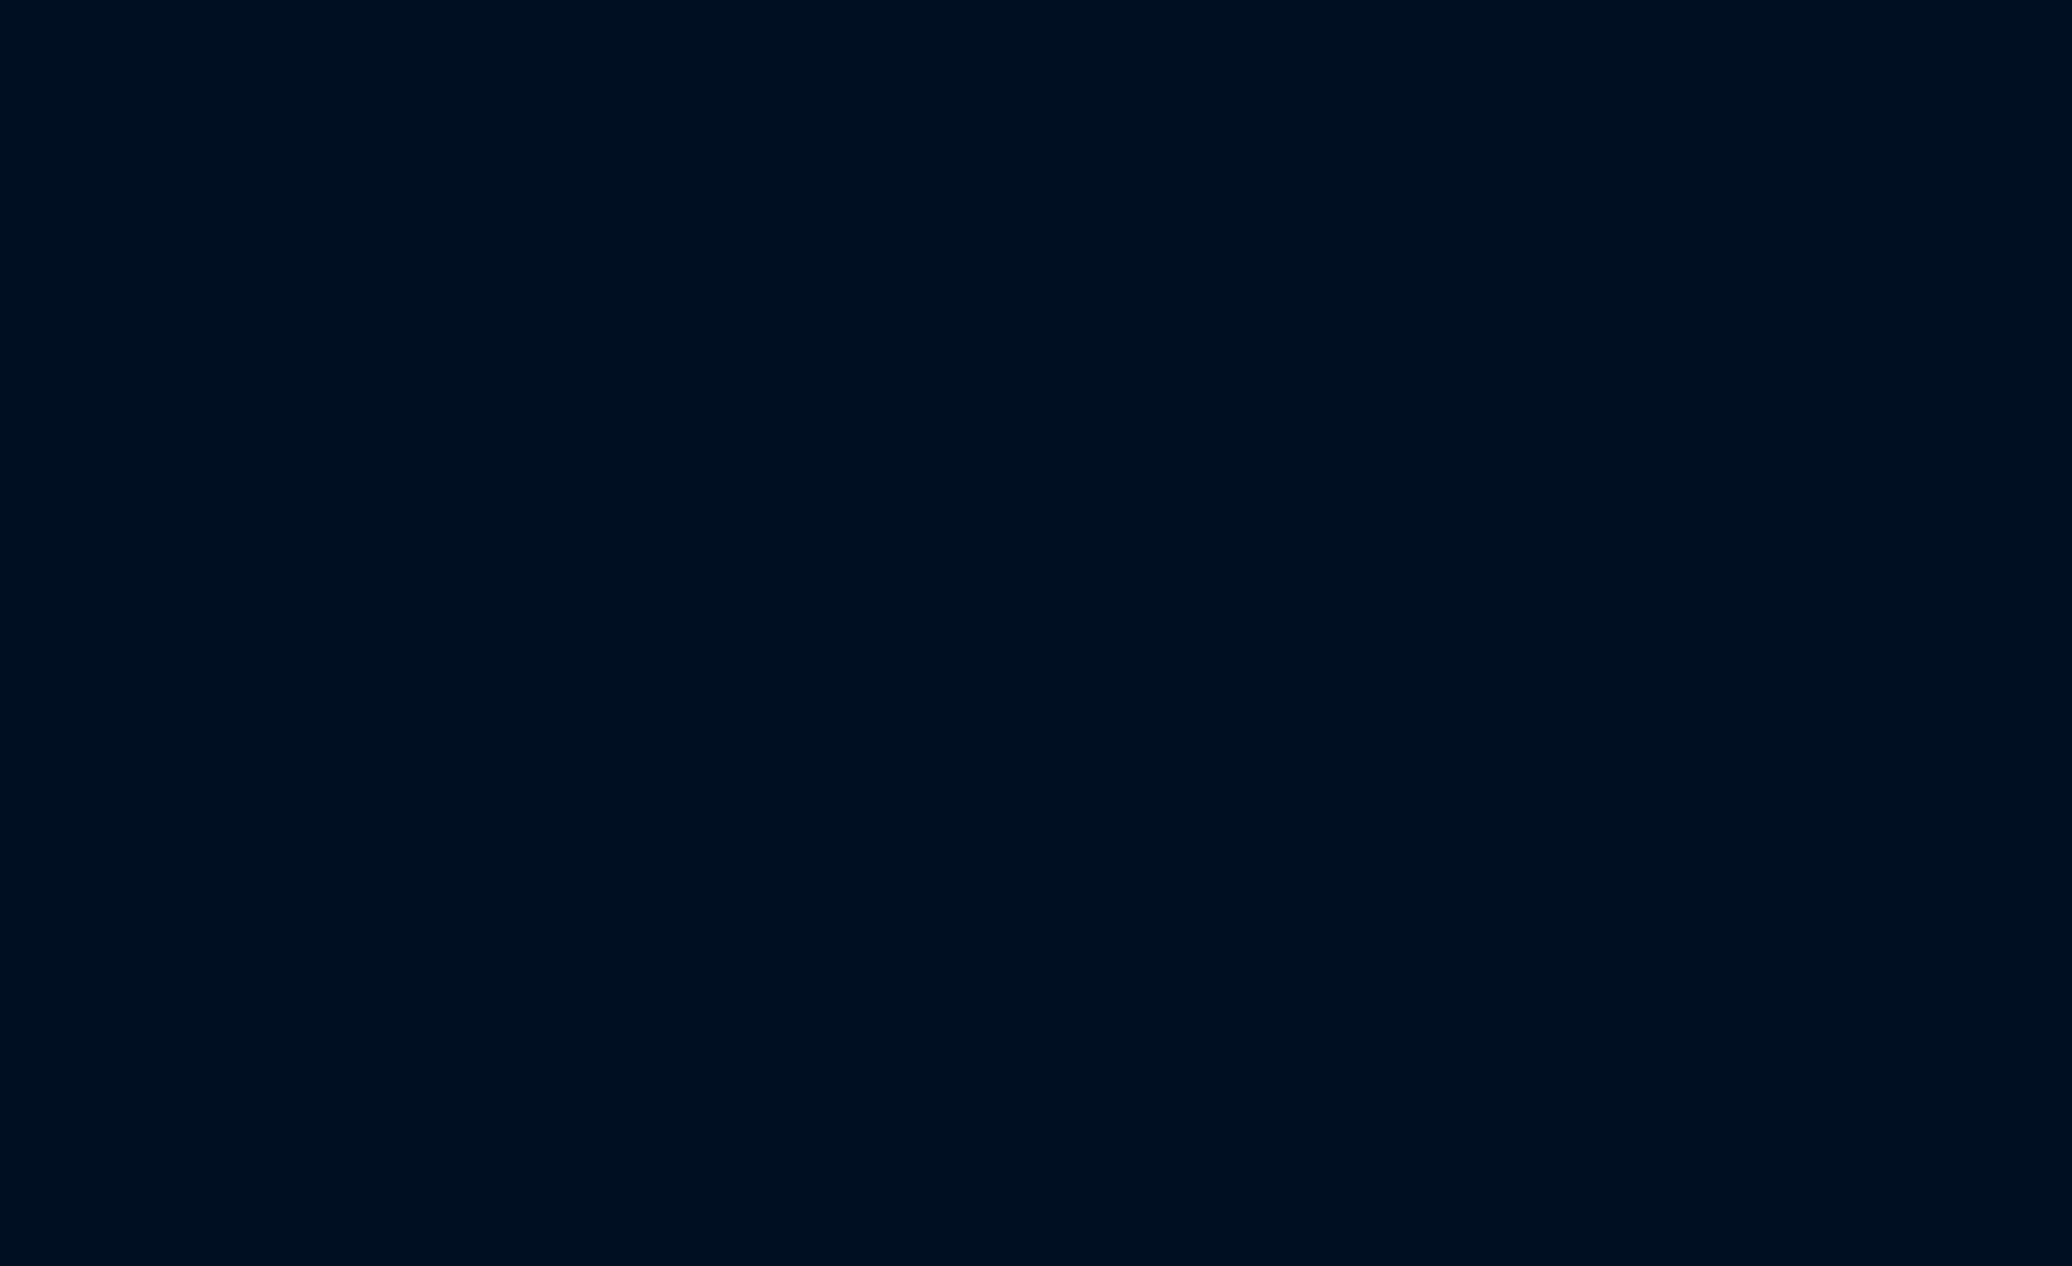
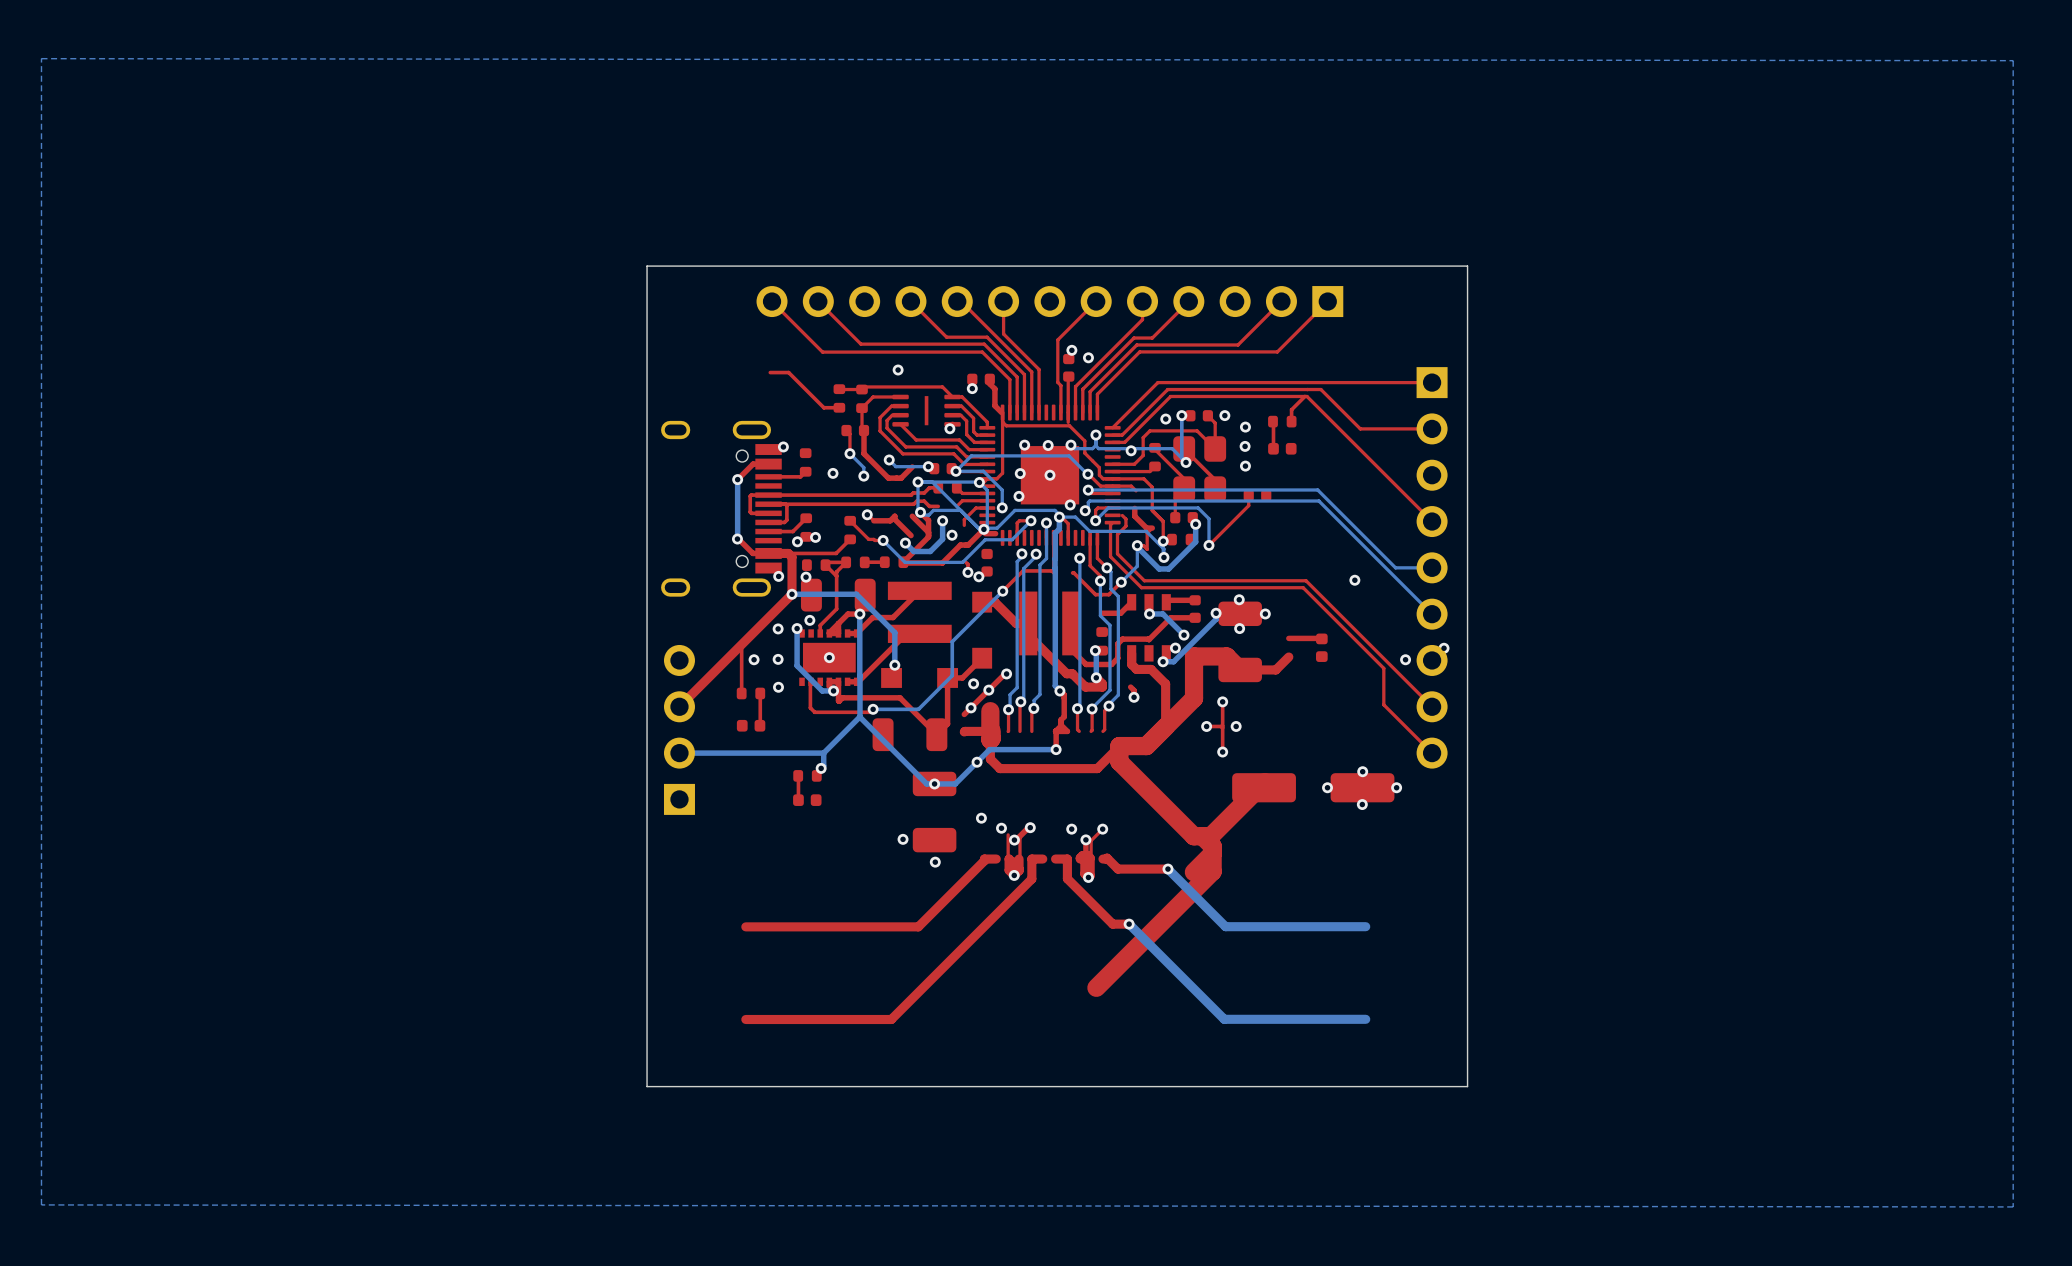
bottom zone outline: none -> (41, 58) (41, 1204) (2013, 1206) (2013, 60) (41, 58)
board edge: none -> (1467, 266) (647, 266) (647, 1086) (1467, 1086) (1467, 266)
top track: none -> (772, 301) (822, 352) (982, 352) (1009, 379) (1009, 412)
top track: none -> (818, 301) (860, 344) (984, 344) (1017, 377) (1017, 412)
top track: none -> (910, 301) (946, 337) (987, 337) (1024, 374) (1024, 412)
top track: none -> (957, 301) (961, 301) (1031, 372) (1031, 412)
top track: none -> (1003, 301) (1003, 334) (1039, 369) (1039, 412)
part: none -> (1049, 301)
top track: none -> (1096, 301) (1057, 339) (1057, 382) (1060, 385) (1060, 412)
top track: none -> (1142, 301) (1142, 319) (1075, 386) (1075, 412)
top track: none -> (1188, 301) (1152, 338) (1133, 338) (1082, 389) (1082, 412)
top track: none -> (1281, 301) (1238, 344) (1136, 344) (1090, 391) (1090, 412)
top track: none -> (1327, 301) (1277, 351) (1139, 351) (1097, 394) (1097, 412)
via: none -> (1071, 350)
via: none -> (1088, 357)
part: none -> (1068, 367)
via: none -> (898, 370)
top track: none -> (770, 372) (788, 372) (823, 407) (839, 407)
top track: none -> (1068, 376) (1068, 422)
part: none -> (981, 379)
top track: none -> (989, 379) (989, 383) (994, 388) (994, 405) (1001, 412)
top track: none -> (1432, 382) (1157, 382) (1112, 427)
via: none -> (972, 388)
top track: none -> (839, 389) (862, 389) (864, 386) (942, 386) (952, 396) (962, 396) (987, 422) (987, 427)
top track: none -> (900, 396) (873, 396) (862, 408) (864, 453) (888, 478) (901, 478) (912, 466)
top track: none -> (1304, 396) (1291, 409) (1291, 421)
part: none -> (839, 398)
part: none -> (862, 398)
top track: none -> (900, 406) (891, 406) (880, 417) (880, 431) (902, 453) (953, 453) (964, 464) (987, 464)
top track: none -> (952, 406) (961, 406) (973, 418) (973, 431) (977, 435) (987, 435)
part: none -> (926, 410)
top track: none -> (1002, 412) (1002, 473) (996, 478) (987, 478) (983, 482) (979, 482)
top track: none -> (900, 415) (892, 415) (887, 420) (887, 428) (905, 446) (956, 446) (966, 456) (987, 456)
top track: none -> (952, 415) (960, 415) (966, 421) (966, 434) (974, 442) (987, 442)
bottom track: none -> (1181, 415) (1181, 458) (1186, 462) (1172, 448) (1098, 448) (1095, 445) (1095, 435)
via: none -> (1181, 415)
part: none -> (1199, 415)
top track: none -> (1207, 415) (1215, 423) (1215, 448) (1197, 430) (1149, 430) (1143, 437) (1143, 455) (1134, 464) (1112, 464)
via: none -> (1224, 415)
via: none -> (1165, 419)
top track: none -> (1272, 421) (1273, 448)
part: none -> (1282, 421)
top track: none -> (1002, 422) (1006, 425) (1069, 425) (1084, 441) (1084, 453) (1092, 460)
top track: none -> (900, 424) (916, 439) (959, 439) (969, 449) (987, 449)
via: none -> (1245, 427)
via: none -> (949, 428)
top track: none -> (1432, 428) (1360, 428) (1320, 389) (1167, 389) (1122, 435) (1112, 435)
top track: none -> (846, 430) (849, 434) (849, 453)
part: none -> (855, 430)
via: none -> (1095, 435)
top track: none -> (1112, 442) (1124, 442) (1170, 396) (1307, 396) (1432, 521)
via: none -> (1024, 445)
via: none -> (1048, 445)
bottom track: none -> (1070, 445) (1074, 448) (1092, 448) (1095, 445)
via: none -> (1070, 445)
via: none -> (783, 446)
via: none -> (1245, 446)
top track: none -> (1155, 447) (1184, 478) (1184, 489) (1175, 498) (1175, 517)
top track: none -> (1184, 448) (1215, 479) (1215, 489)
part: none -> (1282, 448)
via: none -> (1131, 450)
bottom track: none -> (849, 453) (863, 467) (863, 476)
via: none -> (849, 453)
part: none -> (1155, 457)
bottom track: none -> (889, 459) (895, 466) (928, 466)
via: none -> (889, 459)
top track: none -> (1092, 461) (1099, 467) (1099, 475) (1103, 478) (1143, 478) (1152, 487) (1152, 510) (1163, 521) (1163, 541)
part: none -> (805, 462)
via: none -> (1186, 462)
top track: none -> (768, 464) (753, 464) (737, 479)
via: none -> (928, 466)
top track: none -> (1155, 466) (1149, 471) (1112, 471)
via: none -> (1245, 466)
part: none -> (942, 468)
part: none -> (1199, 469)
top track: none -> (805, 471) (800, 476) (768, 476)
via: none -> (955, 471)
via: none -> (833, 473)
via: none -> (1020, 473)
top track: none -> (1087, 474) (1100, 486) (1131, 486) (1136, 490)
bottom track: none -> (1087, 474) (1068, 455) (971, 455) (955, 471) (983, 471) (1002, 490) (1002, 507)
via: none -> (1087, 474)
part: none -> (1049, 475)
via: none -> (1049, 475)
via: none -> (863, 476)
bottom track: none -> (737, 479) (737, 538)
via: none -> (737, 479)
via: none -> (917, 482)
bottom track: none -> (932, 482) (979, 529) (997, 528) (1014, 510) (1054, 510) (1059, 517)
via: none -> (979, 482)
top track: none -> (938, 487) (929, 487) (924, 493) (913, 493) (911, 495) (750, 496) (751, 513) (768, 513)
part: none -> (947, 487)
top track: none -> (956, 487) (962, 493) (987, 493)
top track: none -> (1090, 487) (1088, 490) (1091, 493) (1112, 493)
bottom track: none -> (1090, 489) (1317, 489) (1395, 567) (1432, 567)
via: none -> (1088, 490)
top track: none -> (1248, 495) (1248, 505) (1208, 545)
part: none -> (1257, 495)
via: none -> (1018, 496)
top track: none -> (987, 500) (962, 500) (956, 506)
top track: none -> (768, 504) (913, 504) (916, 501) (924, 501) (929, 506) (938, 506)
top track: none -> (785, 504) (786, 520) (784, 522) (768, 522)
via: none -> (1070, 504)
via: none -> (1002, 507)
part: none -> (721, 508)
top track: none -> (987, 508) (975, 508) (964, 519) (964, 525)
top track: none -> (1112, 508) (1097, 508) (1095, 510) (1095, 520)
top track: none -> (1134, 508) (1134, 516) (1146, 528) (1152, 528) (1147, 533) (1147, 549) (1143, 545) (1137, 545)
bottom track: none -> (960, 510) (933, 510) (928, 515) (923, 515) (917, 509) (917, 482) (978, 482) (987, 490) (987, 525) (983, 529)
bottom track: none -> (1085, 510) (1088, 507) (1089, 501) (1318, 501) (1432, 614)
via: none -> (1085, 510)
top track: none -> (920, 512) (928, 520) (928, 537) (904, 562) (942, 562) (960, 545) (968, 545) (983, 529)
via: none -> (920, 512)
top track: none -> (867, 514) (873, 520) (890, 520) (894, 516) (894, 519) (911, 535)
via: none -> (867, 514)
top track: none -> (1122, 515) (1125, 519) (1125, 526) (1117, 534) (1117, 553) (1144, 580) (1306, 580) (1432, 706)
top track: none -> (912, 516) (928, 532)
top track: none -> (1059, 517) (1068, 523) (1068, 537)
bottom track: none -> (1059, 517) (1059, 528) (1055, 533) (1055, 558)
bottom track: none -> (1059, 517) (1075, 517) (1089, 531) (1146, 531) (1163, 549) (1163, 557) (1163, 556) (1163, 541)
via: none -> (1059, 517)
part: none -> (1184, 517)
top track: none -> (806, 518) (792, 531) (768, 531)
top track: none -> (850, 520) (868, 539) (883, 540)
bottom track: none -> (942, 520) (942, 539) (930, 551) (913, 551) (905, 543)
via: none -> (942, 520)
top track: none -> (1030, 520) (1019, 520) (1017, 523) (1017, 537)
bottom track: none -> (1030, 520) (1012, 539) (985, 539) (962, 562) (905, 562) (883, 540)
via: none -> (1030, 520)
bottom track: none -> (1095, 520) (1108, 507) (1198, 507) (1208, 518) (1208, 545)
via: none -> (1095, 520)
top track: none -> (1112, 522) (1110, 524) (1110, 556) (1141, 587) (1303, 587) (1383, 668) (1383, 704) (1432, 753)
bottom track: none -> (1046, 523) (1046, 558) (1039, 565) (1039, 694) (1034, 700) (1033, 708)
via: none -> (1046, 523)
bottom track: none -> (1195, 524) (1195, 542) (1168, 568) (1159, 568) (1137, 545) (1137, 566) (1121, 582)
via: none -> (1195, 524)
part: none -> (806, 527)
via: none -> (983, 529)
part: none -> (850, 530)
top track: none -> (995, 533) (985, 533)
via: none -> (952, 535)
via: none -> (815, 537)
top track: none -> (1053, 537) (1054, 572) (1052, 570) (1023, 570) (1002, 591)
top track: none -> (1090, 537) (1090, 565) (1100, 575) (1100, 580)
top track: none -> (1097, 537) (1097, 558) (1106, 567)
top track: none -> (737, 539) (752, 553) (768, 553)
via: none -> (737, 539)
top track: none -> (850, 539) (836, 553) (768, 553)
part: none -> (1181, 539)
via: none -> (883, 540)
via: none -> (797, 541)
via: none -> (1163, 541)
via: none -> (905, 543)
via: none -> (1137, 545)
via: none -> (1208, 545)
top track: none -> (768, 553) (788, 553) (792, 557) (792, 594) (679, 706)
bottom track: none -> (1021, 553) (1021, 556) (1017, 561) (1017, 687) (1010, 694) (1010, 707) (1008, 709)
via: none -> (1021, 553)
bottom track: none -> (1036, 554) (1023, 568) (1023, 698) (1020, 701)
via: none -> (1036, 554)
via: none -> (1163, 557)
bottom track: none -> (1055, 558) (1055, 568)
bottom track: none -> (1079, 558) (1077, 558) (1079, 560) (1079, 706) (1077, 708)
via: none -> (1079, 558)
top track: none -> (866, 561) (884, 562)
part: none -> (855, 562)
part: none -> (894, 562)
top track: none -> (966, 562) (967, 572)
part: none -> (987, 562)
part: none -> (816, 565)
bottom track: none -> (1106, 567) (1110, 571) (1110, 589) (1118, 596) (1118, 695) (1108, 706)
via: none -> (1106, 567)
part: none -> (1432, 567)
bottom track: none -> (1055, 568) (1055, 685) (1059, 691)
via: none -> (967, 572)
top track: none -> (1072, 572) (1095, 594) (1108, 594) (1121, 582)
via: none -> (778, 576)
top track: none -> (836, 576) (825, 565) (828, 562) (846, 562) (836, 571) (836, 609) (820, 625) (820, 633)
via: none -> (978, 576)
via: none -> (806, 577)
bottom track: none -> (1100, 580) (1100, 615) (1109, 625) (1109, 690) (1092, 708)
via: none -> (1100, 580)
via: none -> (1354, 580)
via: none -> (1121, 582)
top track: none -> (919, 590) (893, 617) (872, 617) (856, 633) (847, 633)
bottom track: none -> (1002, 591) (952, 641) (952, 675) (918, 709) (873, 709)
via: none -> (1002, 591)
bottom track: none -> (792, 594) (856, 594) (894, 632) (894, 665)
via: none -> (792, 594)
part: none -> (838, 595)
top track: none -> (865, 595) (859, 600) (859, 614) (848, 614) (829, 632) (829, 633) (838, 633) (838, 623)
via: none -> (1239, 599)
top track: none -> (1195, 600) (1168, 600) (1166, 602)
top track: none -> (982, 602) (994, 602) (1016, 623) (1028, 623) (1028, 635) (1066, 673) (1072, 673) (1085, 687) (1102, 687) (1102, 683) (1096, 677)
top track: none -> (1131, 602) (1120, 613) (1101, 613)
part: none -> (1195, 609)
part: none -> (919, 612)
bottom track: none -> (1149, 613) (1162, 613) (1184, 635)
via: none -> (1149, 613)
bottom track: none -> (1216, 613) (1216, 619) (1173, 661) (1163, 661)
via: none -> (1216, 613)
via: none -> (1265, 613)
bottom track: none -> (859, 614) (859, 675)
via: none -> (859, 614)
top track: none -> (1195, 617) (1170, 617) (1149, 639) (1122, 639) (1117, 643) (1117, 658) (1111, 664) (1086, 664) (1071, 649) (1071, 623)
via: none -> (809, 620)
part: none -> (1049, 623)
part: none -> (1149, 627)
via: none -> (778, 628)
bottom track: none -> (797, 628) (797, 665) (822, 690) (833, 690)
via: none -> (797, 628)
via: none -> (1239, 628)
part: none -> (982, 630)
top track: none -> (919, 633) (906, 633) (858, 681) (847, 681)
via: none -> (1184, 635)
top track: none -> (1288, 638) (1321, 638)
part: none -> (1102, 641)
part: none -> (1240, 641)
top track: none -> (741, 644) (741, 693)
part: none -> (1321, 647)
via: none -> (1175, 648)
via: none -> (1444, 648)
bottom track: none -> (1095, 650) (1096, 677)
via: none -> (1095, 650)
top track: none -> (1131, 653) (1131, 664) (1136, 669) (1151, 669) (1165, 683) (1165, 726)
part: none -> (829, 657)
via: none -> (829, 657)
top track: none -> (1288, 657) (1275, 669) (1240, 669) (1226, 656) (1194, 656) (1194, 698) (1146, 746) (1119, 746) (1119, 761) (1193, 836) (1210, 836) (1264, 782)
top track: none -> (982, 658) (962, 677) (947, 677) (947, 723) (936, 734) (900, 697) (842, 697) (839, 701) (838, 681) (829, 681) (829, 686) (833, 690)
via: none -> (754, 659)
via: none -> (778, 659)
via: none -> (1405, 659)
via: none -> (1163, 661)
via: none -> (894, 665)
top track: none -> (1005, 673) (964, 714)
via: none -> (1006, 673)
bottom track: none -> (860, 676) (860, 716) (823, 753)
part: none -> (919, 677)
via: none -> (1096, 677)
top track: none -> (811, 681) (810, 707) (814, 712) (870, 712) (873, 709)
via: none -> (973, 683)
via: none -> (778, 687)
top track: none -> (1130, 687) (1134, 690) (1134, 697)
via: none -> (833, 690)
via: none -> (988, 690)
top track: none -> (1059, 691) (1064, 694) (1064, 716) (1061, 719) (1061, 725) (1055, 731) (1067, 731) (1061, 725)
via: none -> (1059, 691)
part: none -> (750, 693)
top track: none -> (760, 693) (759, 725)
via: none -> (1134, 697)
via: none -> (1020, 701)
top track: none -> (1222, 701) (1221, 726)
via: none -> (1222, 701)
top track: none -> (1020, 702) (1020, 731)
top track: none -> (1108, 706) (1104, 710) (1104, 729) (1102, 731)
via: none -> (1108, 706)
via: none -> (971, 707)
top track: none -> (1033, 708) (1031, 710) (1031, 731)
via: none -> (1033, 708)
top track: none -> (1077, 708) (1077, 729) (1079, 731)
via: none -> (1077, 708)
top track: none -> (1092, 708) (1091, 731)
via: none -> (1092, 708)
via: none -> (873, 709)
top track: none -> (1008, 709) (1008, 731)
via: none -> (1008, 709)
top track: none -> (990, 711) (990, 739) (991, 731)
bottom track: none -> (859, 717) (926, 783) (955, 783) (989, 749) (1056, 749)
top track: none -> (990, 717) (990, 759) (999, 768) (1097, 768) (1119, 746)
part: none -> (751, 725)
top track: none -> (1206, 726) (1222, 727) (1222, 752)
via: none -> (1206, 726)
via: none -> (1236, 726)
part: none -> (679, 729)
top track: none -> (1056, 730) (1056, 749)
top track: none -> (984, 731) (964, 731)
part: none -> (909, 734)
via: none -> (1056, 749)
via: none -> (1222, 752)
bottom track: none -> (823, 753) (679, 753)
bottom track: none -> (823, 753) (823, 765) (821, 768)
via: none -> (977, 762)
via: none -> (821, 768)
via: none -> (1362, 771)
top track: none -> (798, 775) (798, 800)
part: none -> (807, 775)
via: none -> (934, 783)
part: none -> (1313, 787)
via: none -> (1327, 787)
via: none -> (1396, 787)
part: none -> (807, 800)
via: none -> (1362, 804)
part: none -> (934, 812)
via: none -> (981, 818)
via: none -> (1030, 827)
via: none -> (1001, 828)
via: none -> (1071, 829)
top track: none -> (1102, 829) (1091, 840) (1091, 859) (1085, 853) (1085, 839)
via: none -> (1102, 829)
top track: none -> (1008, 834) (1008, 859) (1020, 859) (1020, 837) (1030, 827) (1026, 827) (1014, 840)
top track: none -> (1202, 836) (1212, 846) (1212, 871) (1096, 987)
via: none -> (903, 839)
via: none -> (1085, 839)
via: none -> (1014, 840)
top track: none -> (1212, 853) (1193, 872)
top track: none -> (1084, 855) (1084, 873) (1088, 877) (1090, 875) (1090, 858) (1087, 855) (1082, 855) (1080, 859)
top track: none -> (996, 859) (984, 859) (918, 926) (745, 926)
top track: none -> (1019, 859) (1019, 870) (1014, 875) (1009, 870) (1009, 859) (1019, 869)
top track: none -> (1042, 859) (1031, 859) (1031, 879) (891, 1019) (745, 1019)
top track: none -> (1055, 859) (1067, 859) (1067, 878) (1112, 924) (1129, 924)
top track: none -> (1102, 859) (1107, 858) (1118, 869) (1167, 869)
via: none -> (935, 862)
bottom track: none -> (1168, 868) (1225, 926) (1365, 926)
via: none -> (1167, 869)
via: none -> (1014, 875)
via: none -> (1088, 877)
bottom track: none -> (1129, 924) (1224, 1019) (1365, 1019)
via: none -> (1129, 924)

